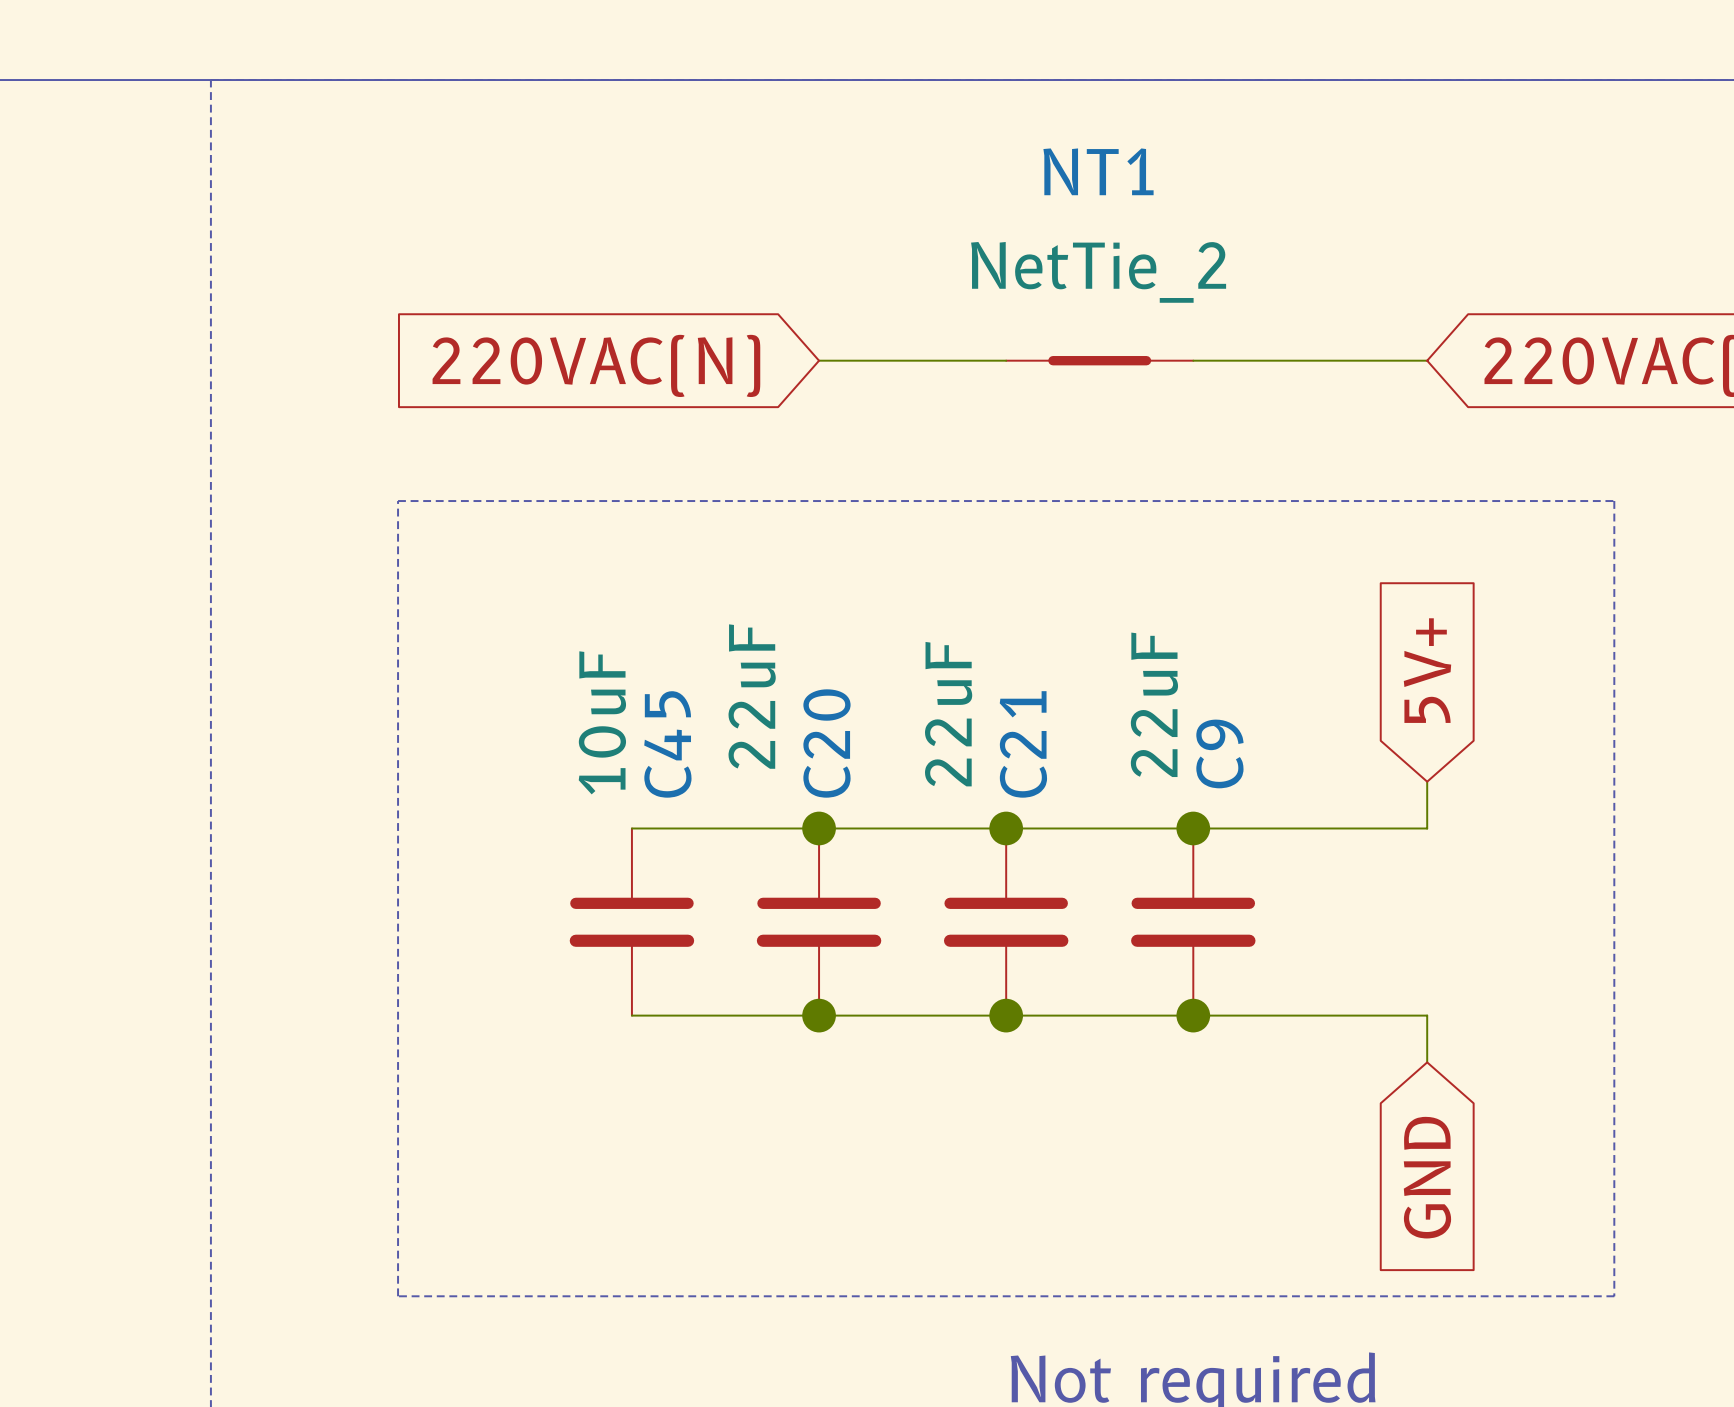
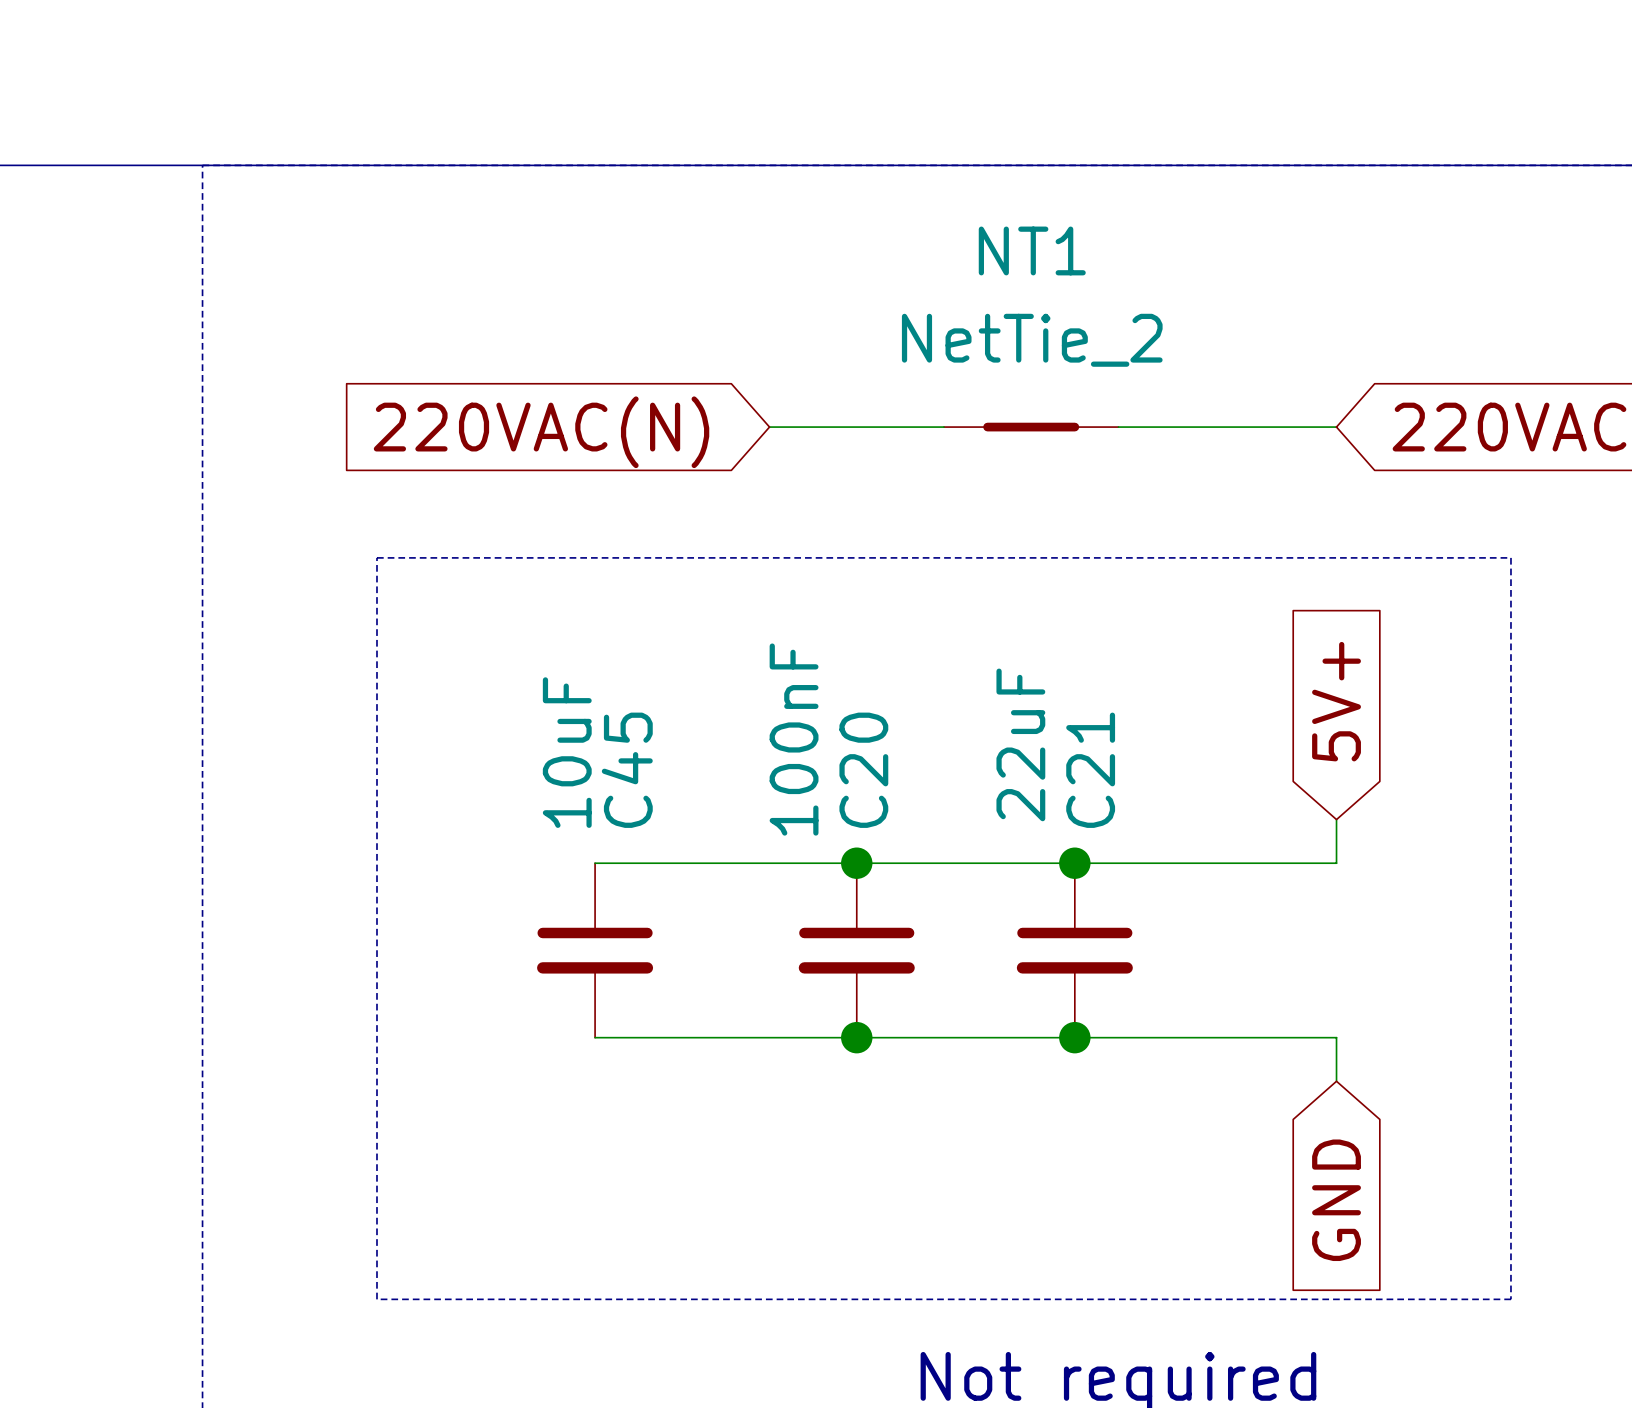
C20 value: 22uF (752, 696) -> 100nF (794, 739)
junction: (819, 828) -> none
junction: none -> (856, 863)
junction: (1006, 828) -> none
junction position: (1193, 828) -> (1074, 863)
C20 position: (819, 922) -> (856, 950)
C21 position: (1006, 922) -> (1074, 950)
C9: 22uF (1193, 922) -> none
junction: (819, 1015) -> none
junction: none -> (856, 1037)
junction: (1006, 1015) -> none
junction position: (1193, 1015) -> (1074, 1037)

